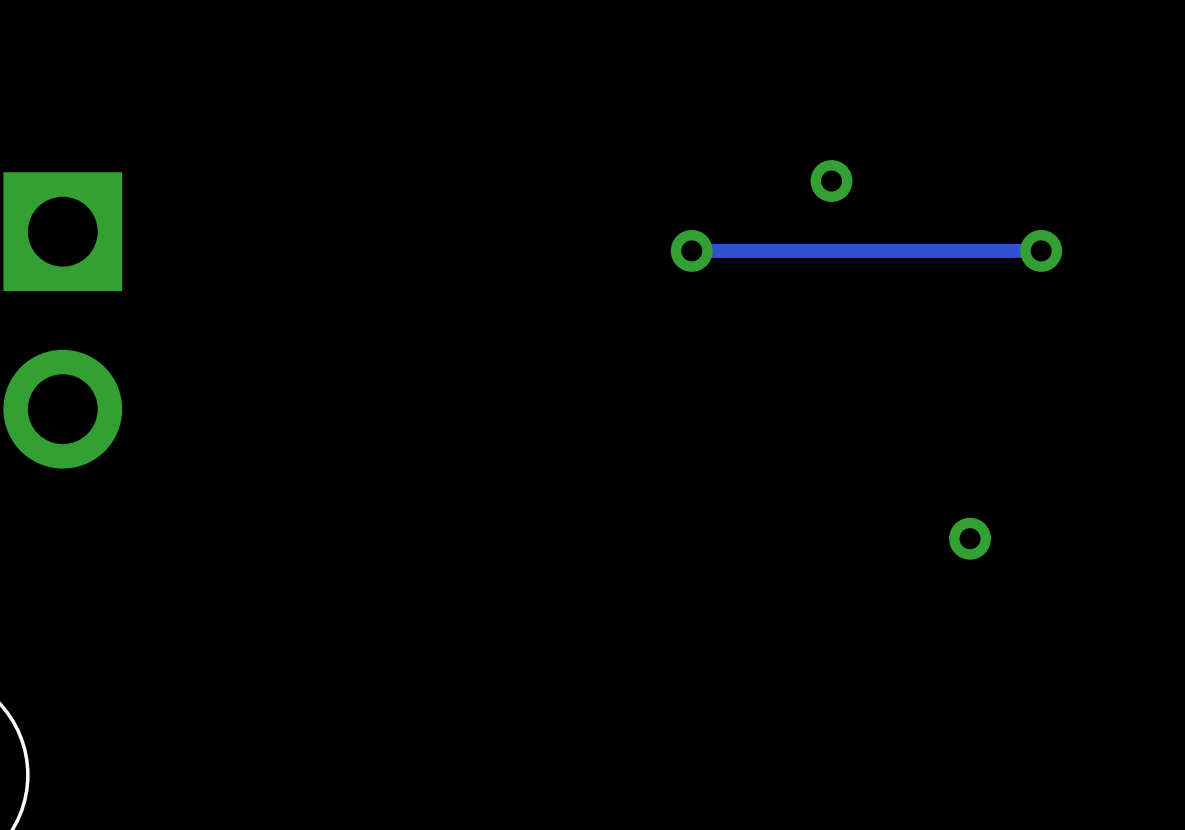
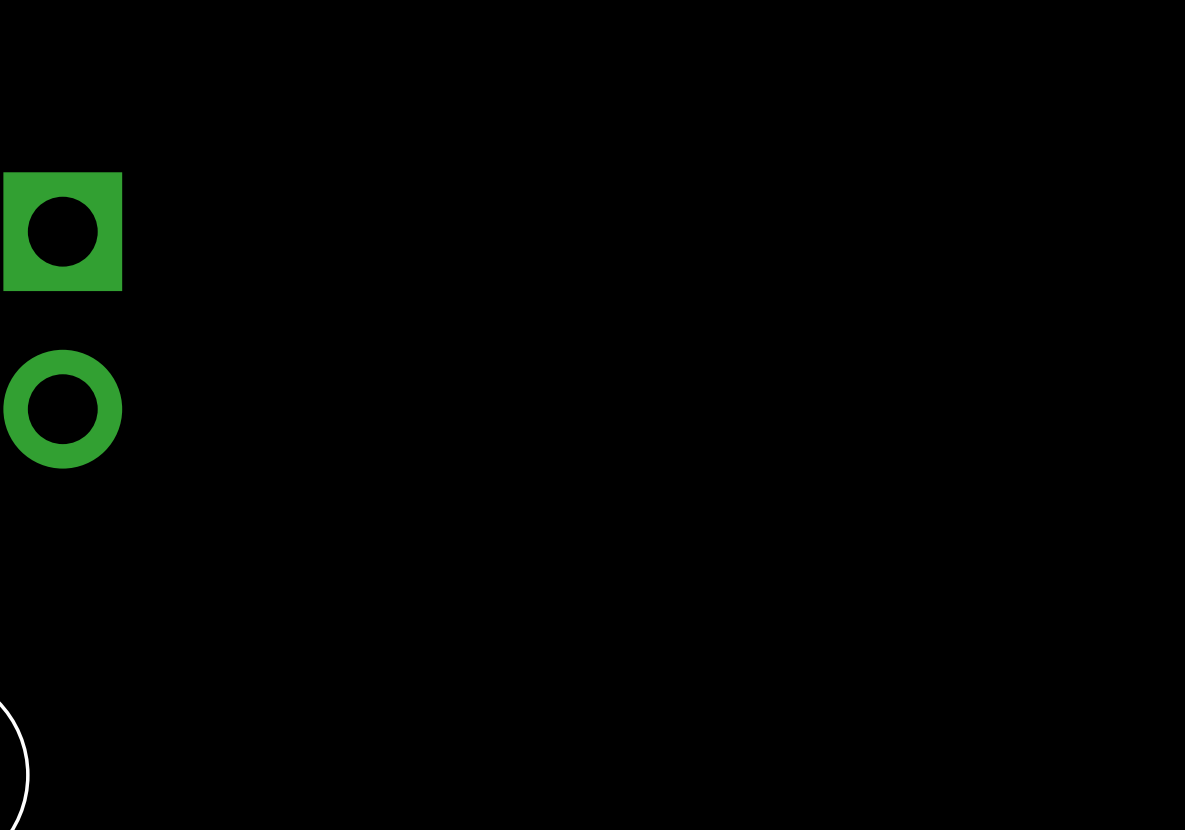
via: (831, 181) -> none
via: (691, 250) -> none
track: (1041, 250) (691, 250) -> none
via: (1041, 250) -> none
via: (970, 538) -> none

